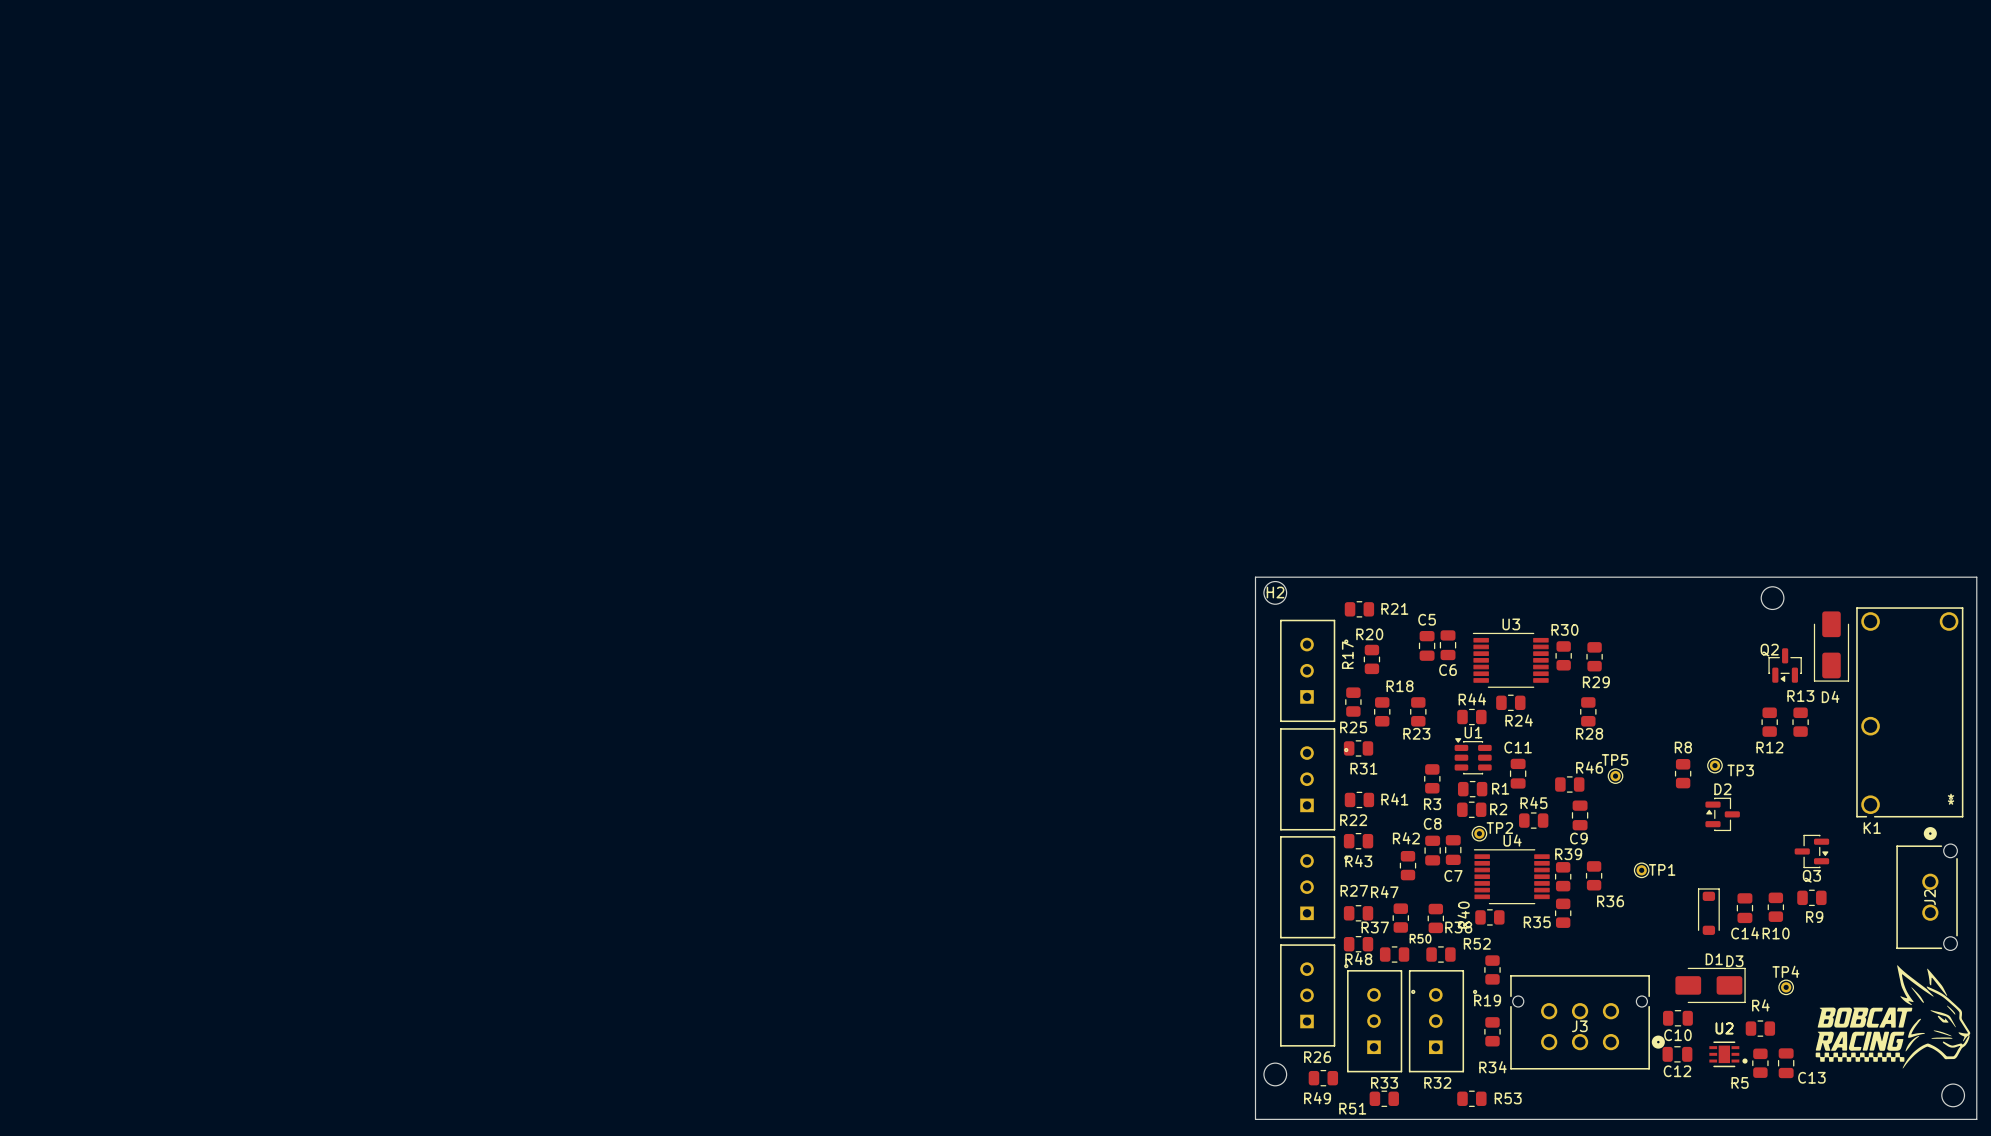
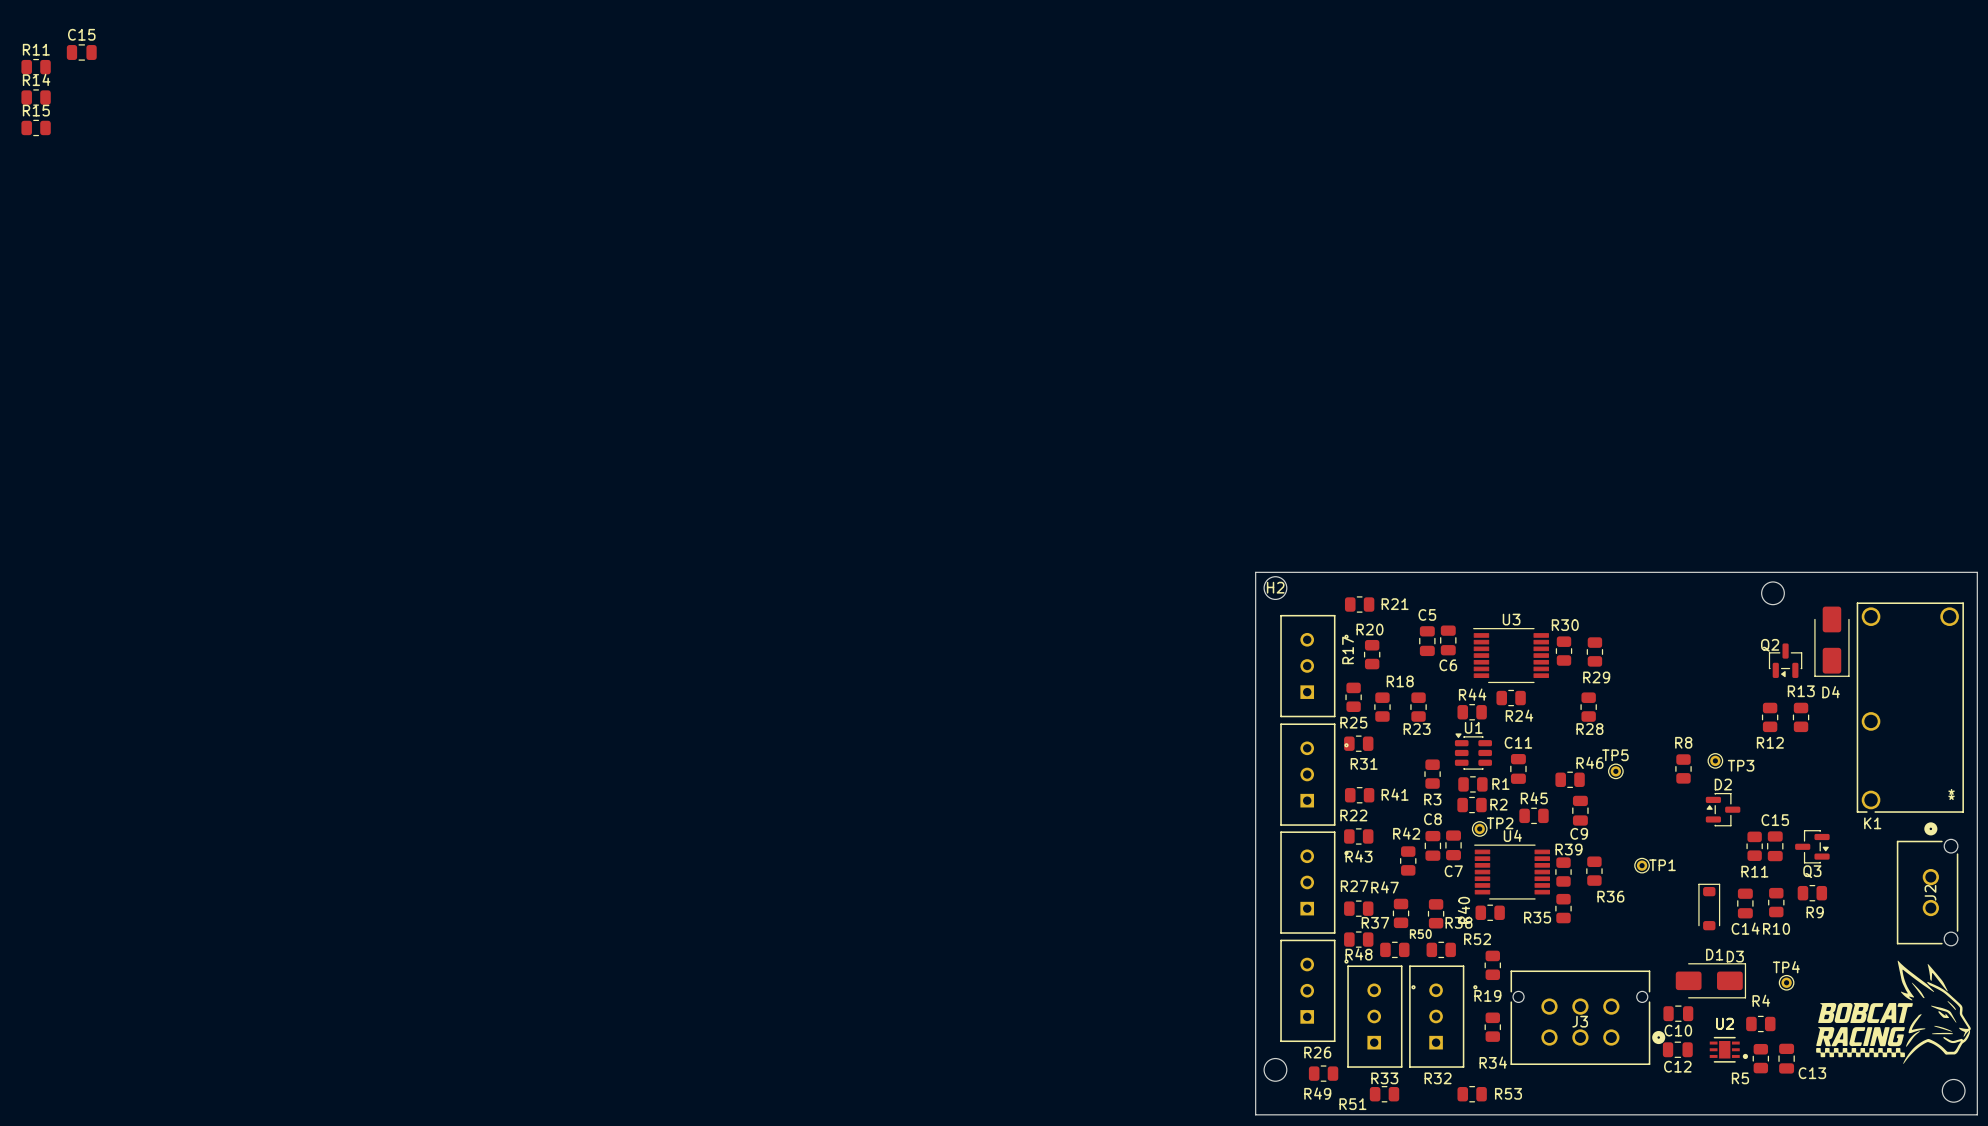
C15: none -> (81, 52)
R11: none -> (36, 67)
R14: none -> (36, 97)
R15: none -> (36, 127)
R11: none -> (1754, 846)
C15: none -> (1775, 846)

